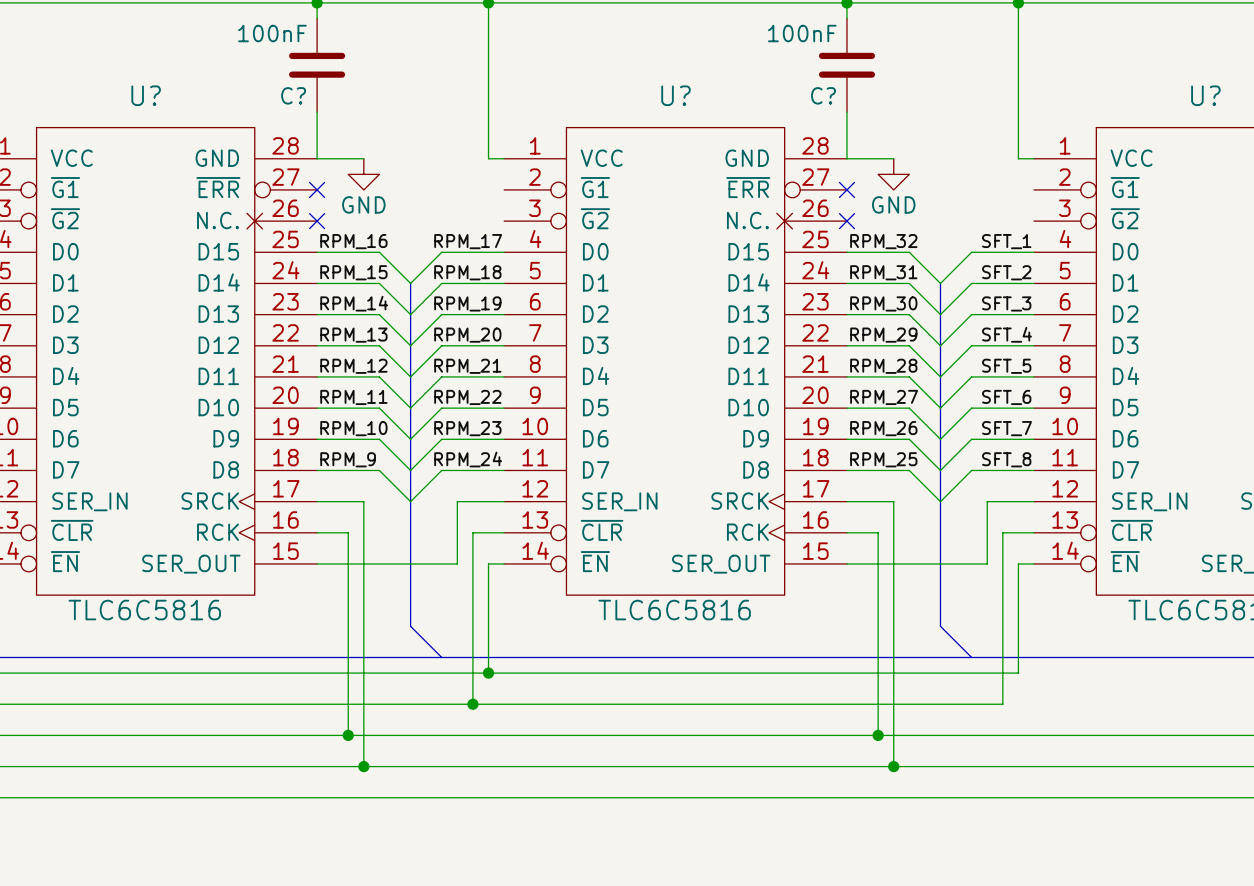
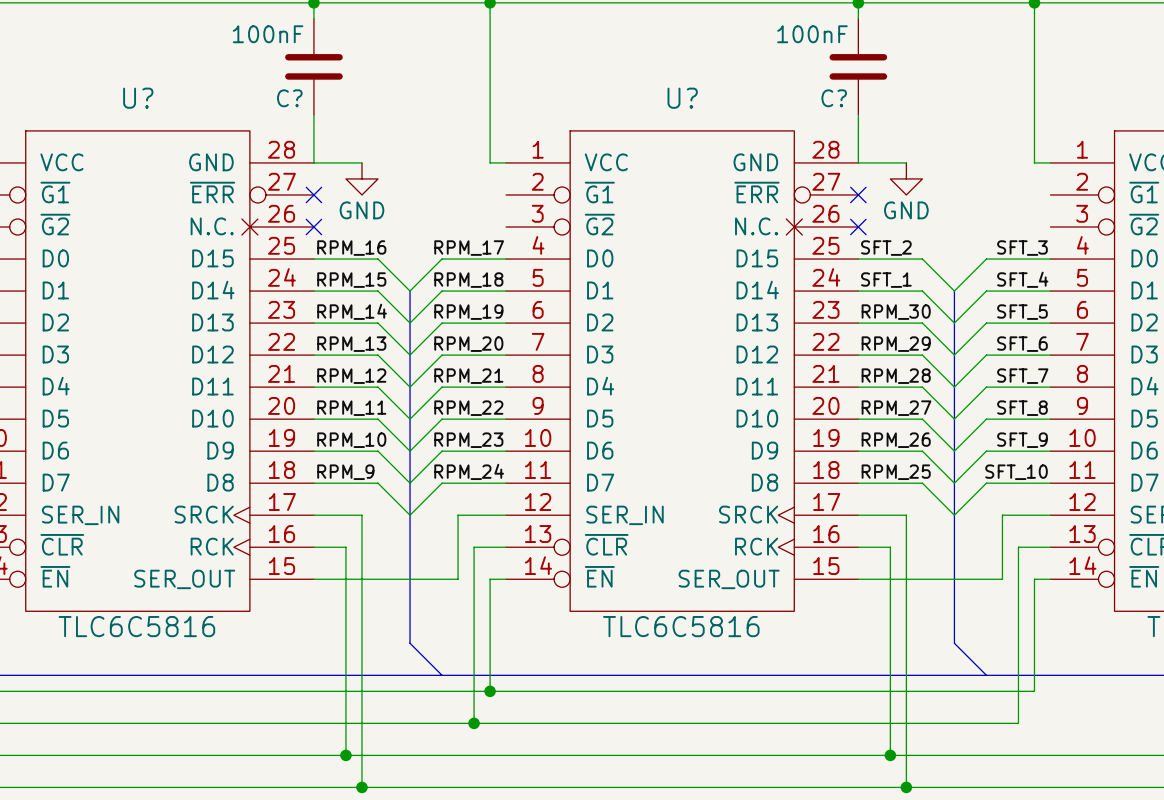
label: RPM_32 (883, 241) -> SFT_2 (886, 248)
label: SFT_1 (1006, 241) -> SFT_3 (1022, 248)
label: RPM_31 (883, 272) -> SFT_1 (886, 280)
label: SFT_2 (1006, 272) -> SFT_4 (1022, 279)
label: SFT_3 (1006, 303) -> SFT_5 (1022, 312)
label: SFT_4 (1007, 334) -> SFT_6 (1022, 344)
label: SFT_5 (1006, 366) -> SFT_7 (1022, 376)
label: SFT_6 (1006, 397) -> SFT_8 (1022, 408)
label: SFT_7 (1007, 428) -> SFT_9 (1022, 440)
label: SFT_8 (1006, 459) -> SFT_10 (1016, 472)

